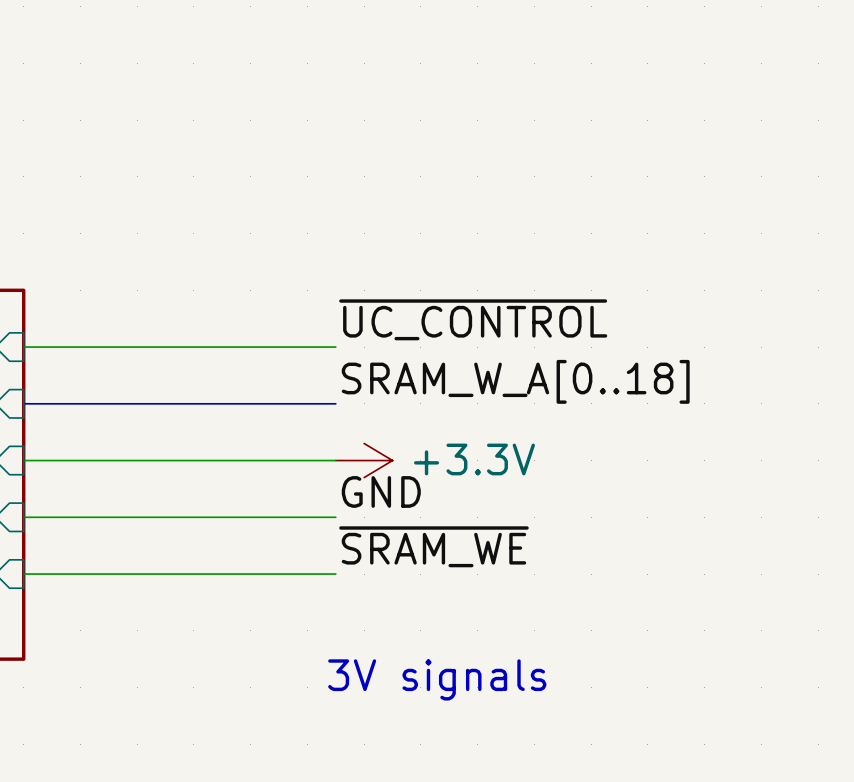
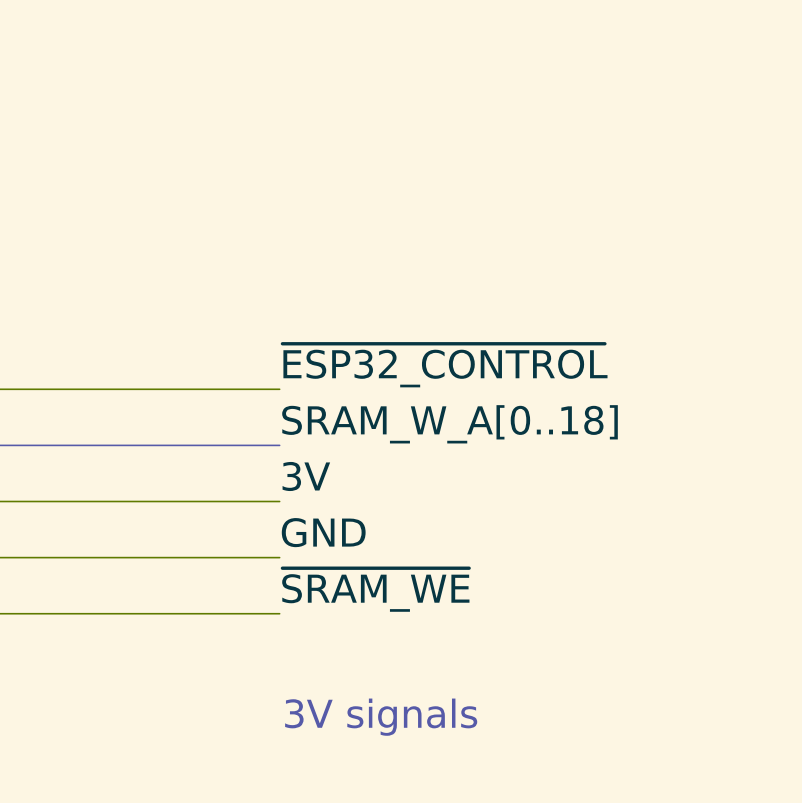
label: ~{UC_CONTROL} (473, 319) -> ~{ESP32_CONTROL} (444, 365)
label: none -> 3V (306, 476)
power symbol: +3.3V (364, 460) -> none

